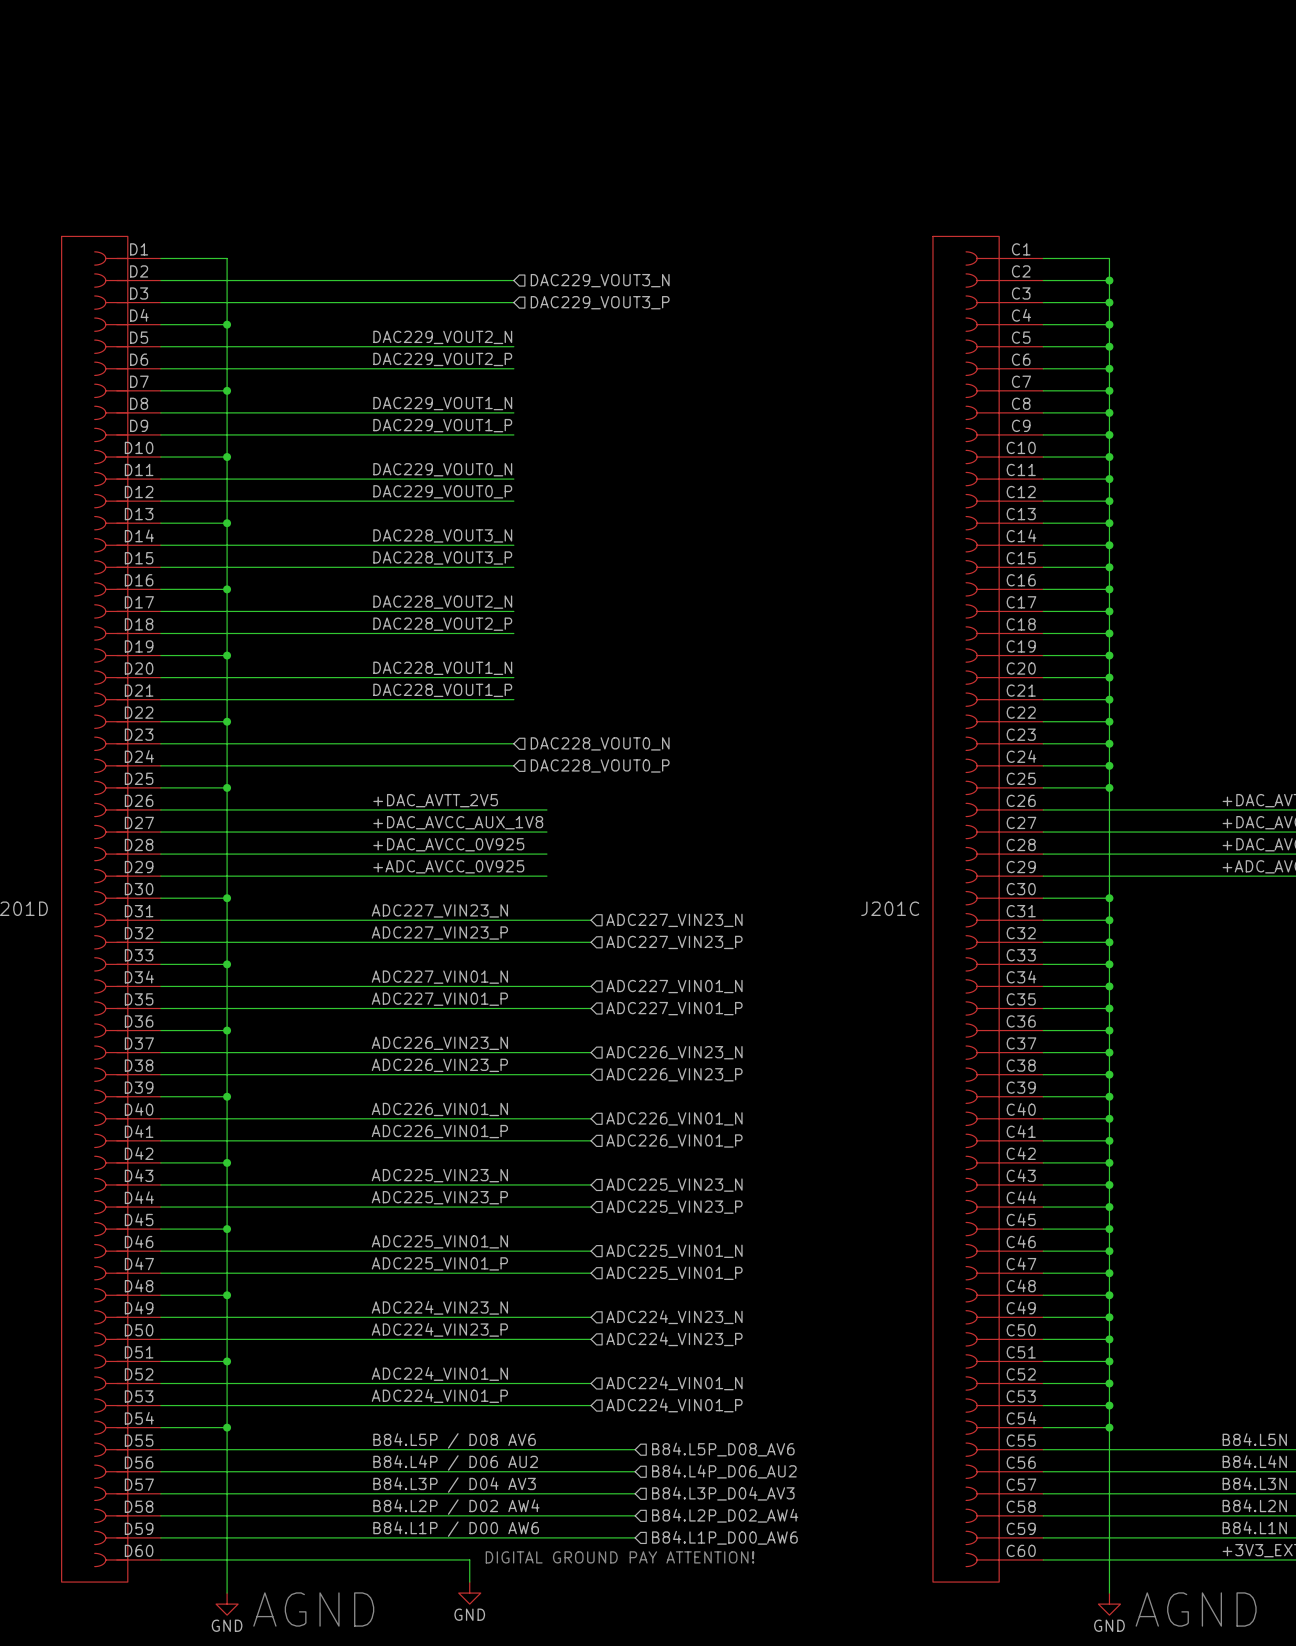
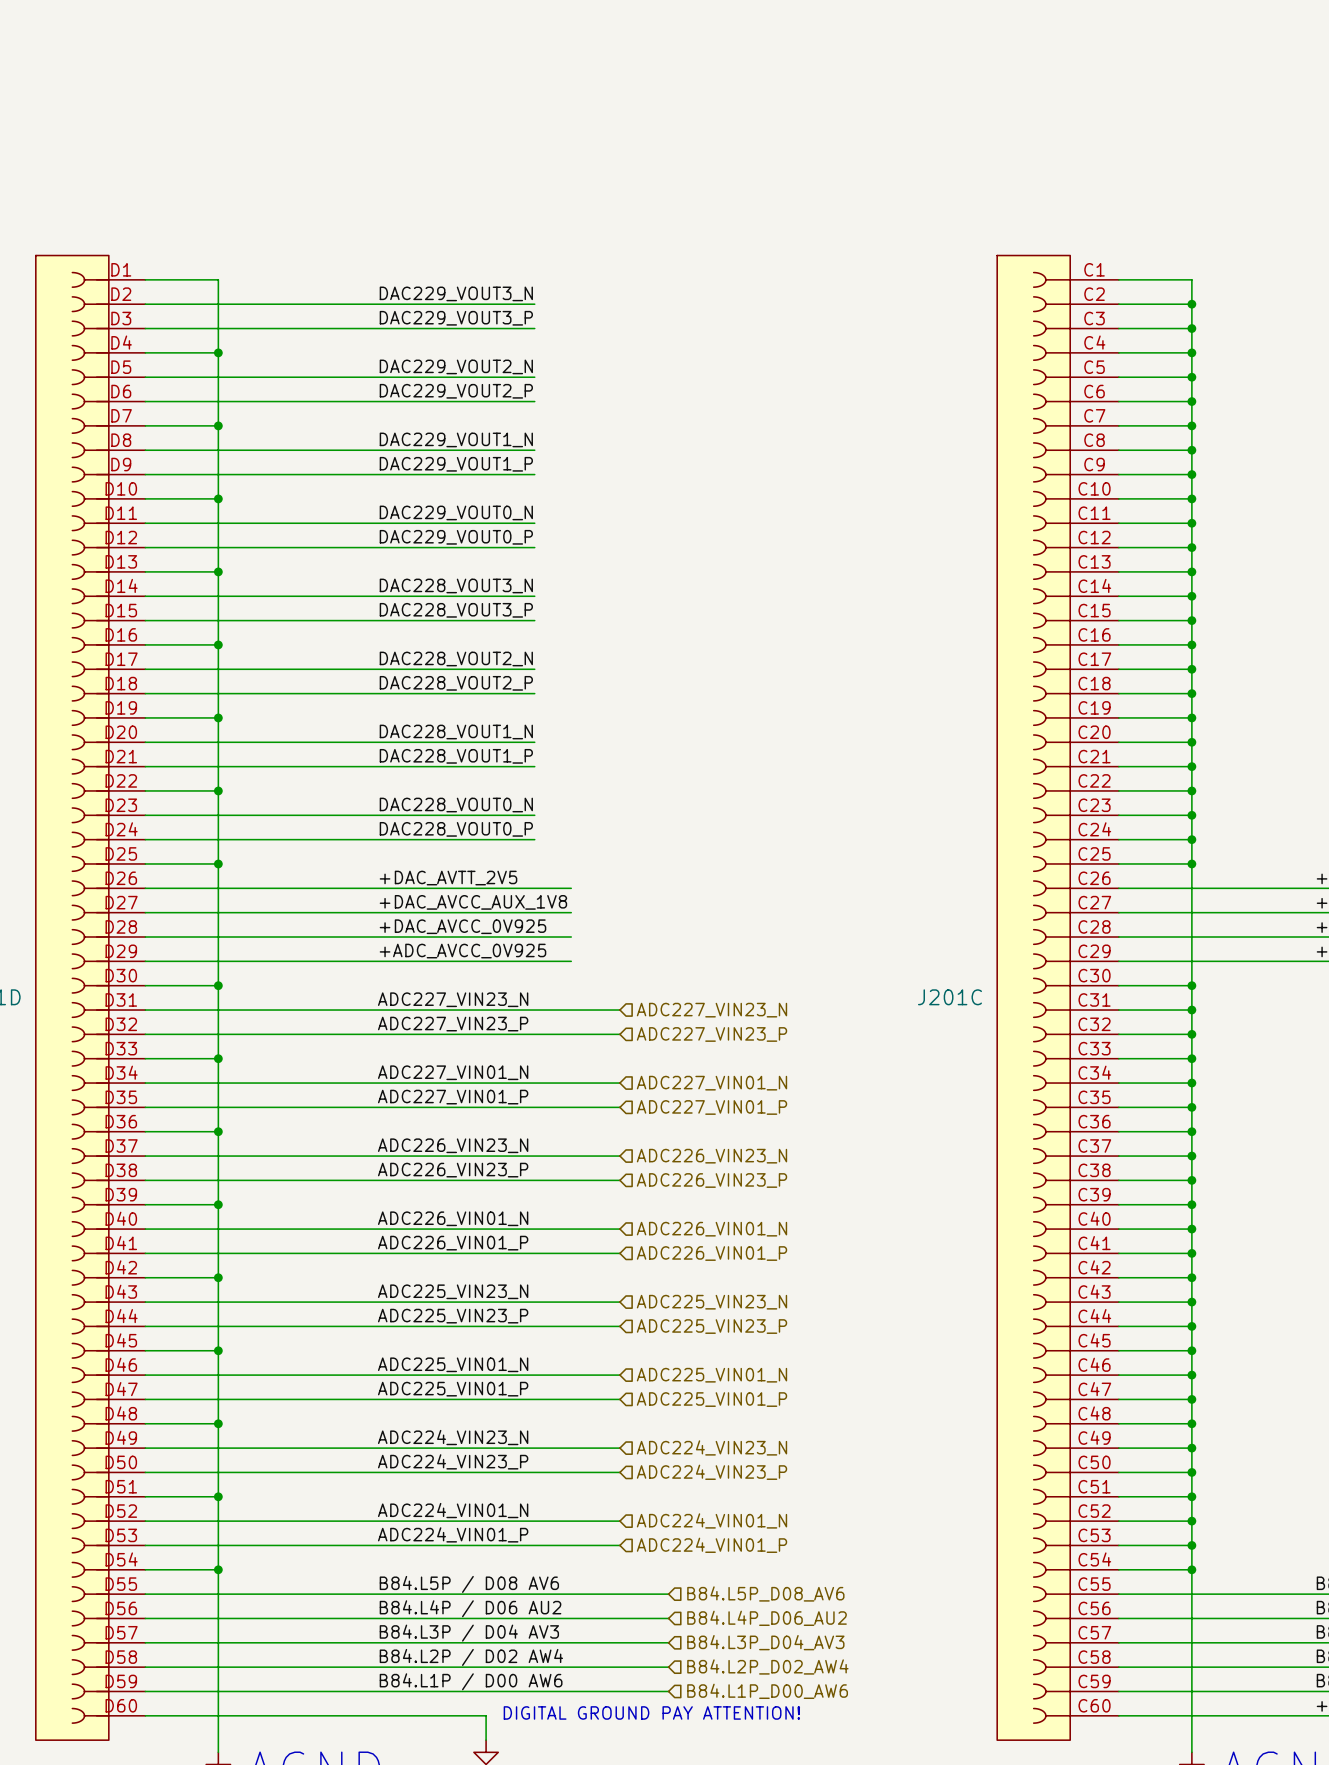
label: none -> DAC229_VOUT3_N (456, 293)
hierarchical label: DAC229_VOUT3_N (600, 280) -> none
label: none -> DAC229_VOUT3_P (456, 318)
hierarchical label: DAC229_VOUT3_P (600, 302) -> none
label: none -> DAC228_VOUT0_N (456, 805)
hierarchical label: DAC228_VOUT0_N (600, 743) -> none
label: none -> DAC228_VOUT0_P (456, 829)
hierarchical label: DAC228_VOUT0_P (600, 765) -> none

